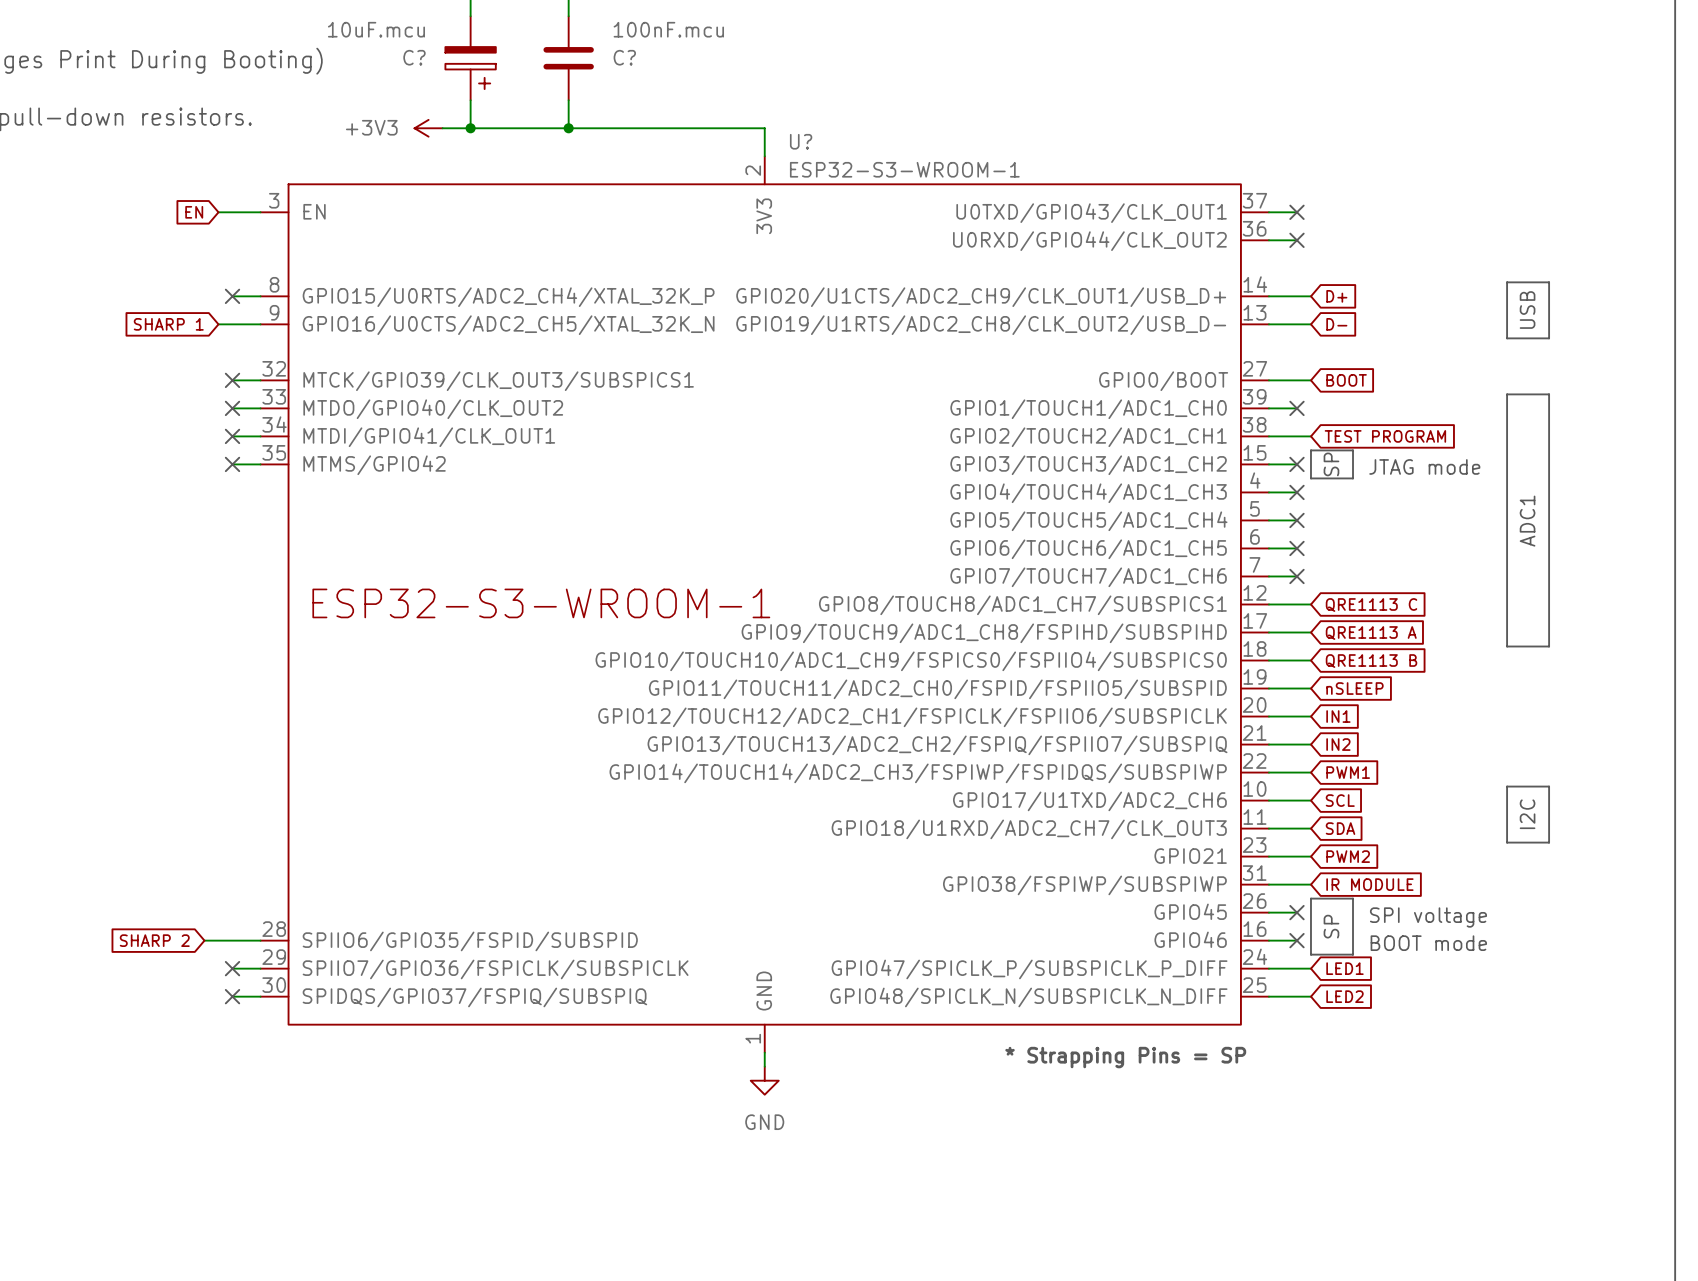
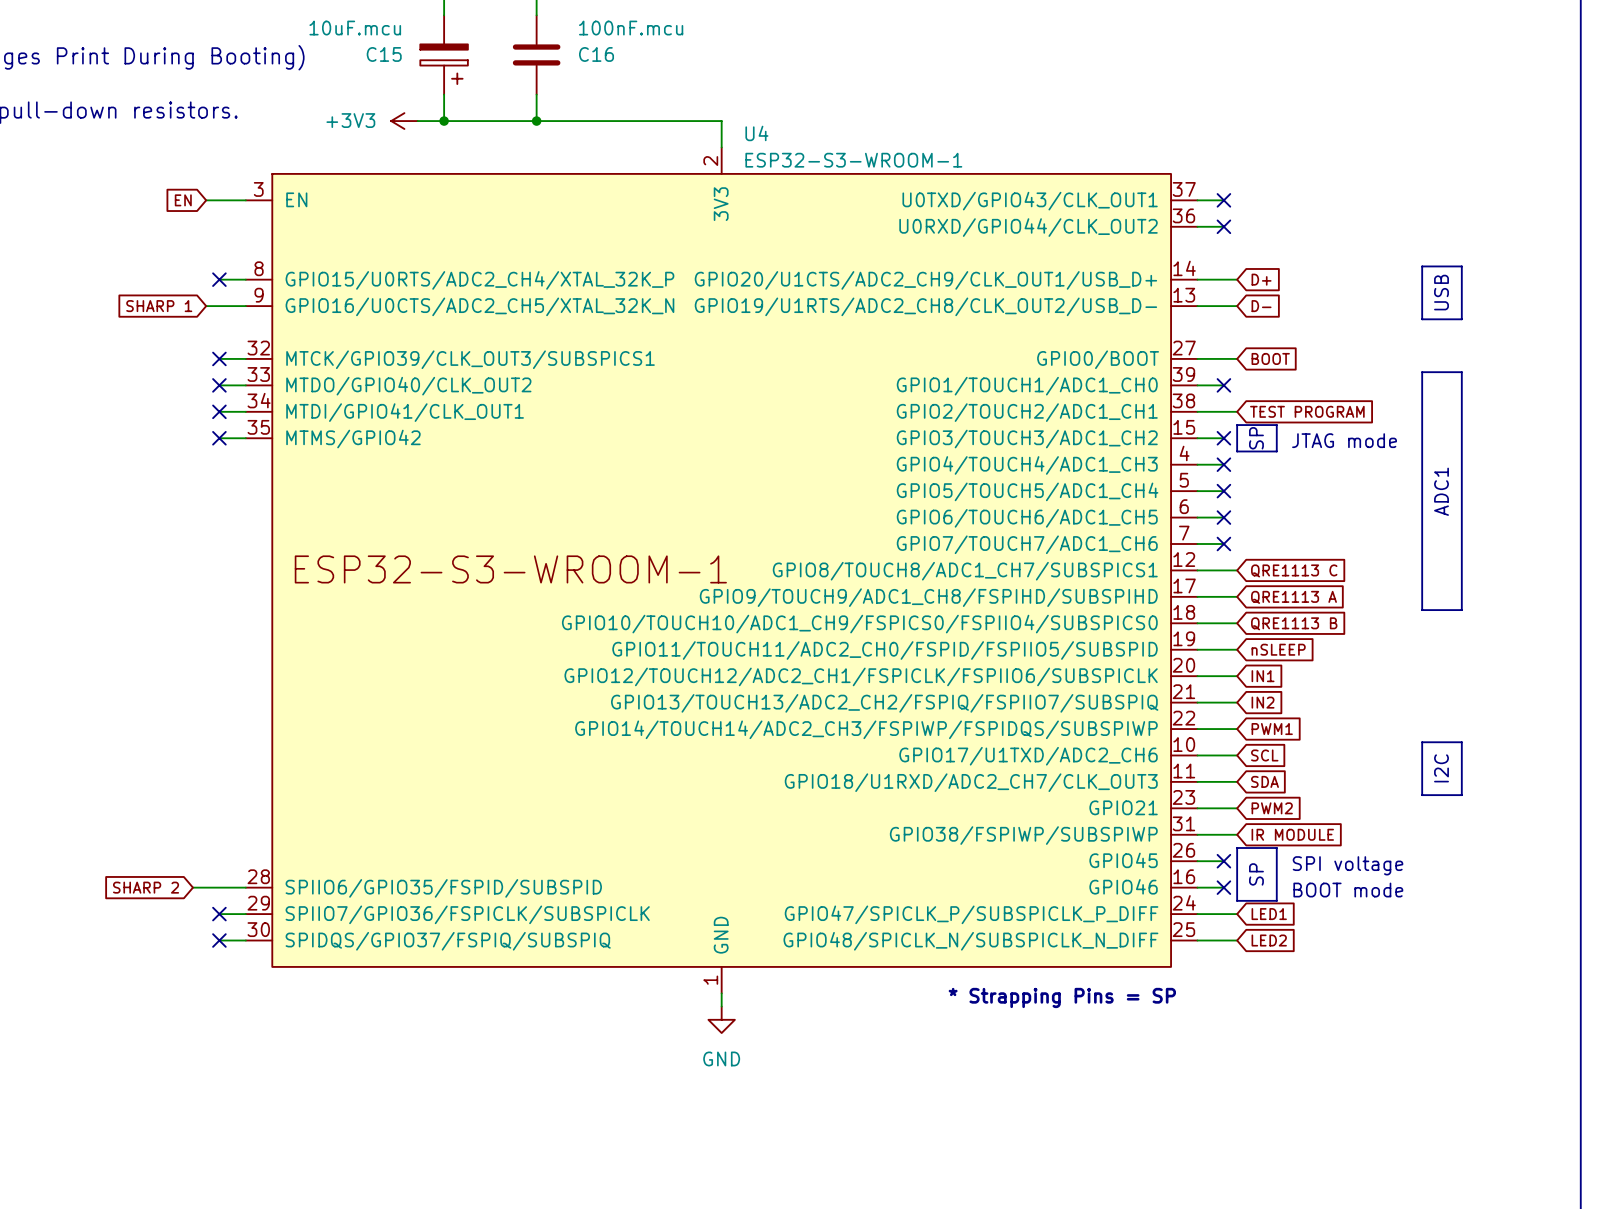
C? name: C? (414, 57) -> C15 (384, 54)
C? name: C? (624, 57) -> C16 (596, 54)
U? name: U? (801, 141) -> U4 (756, 133)

